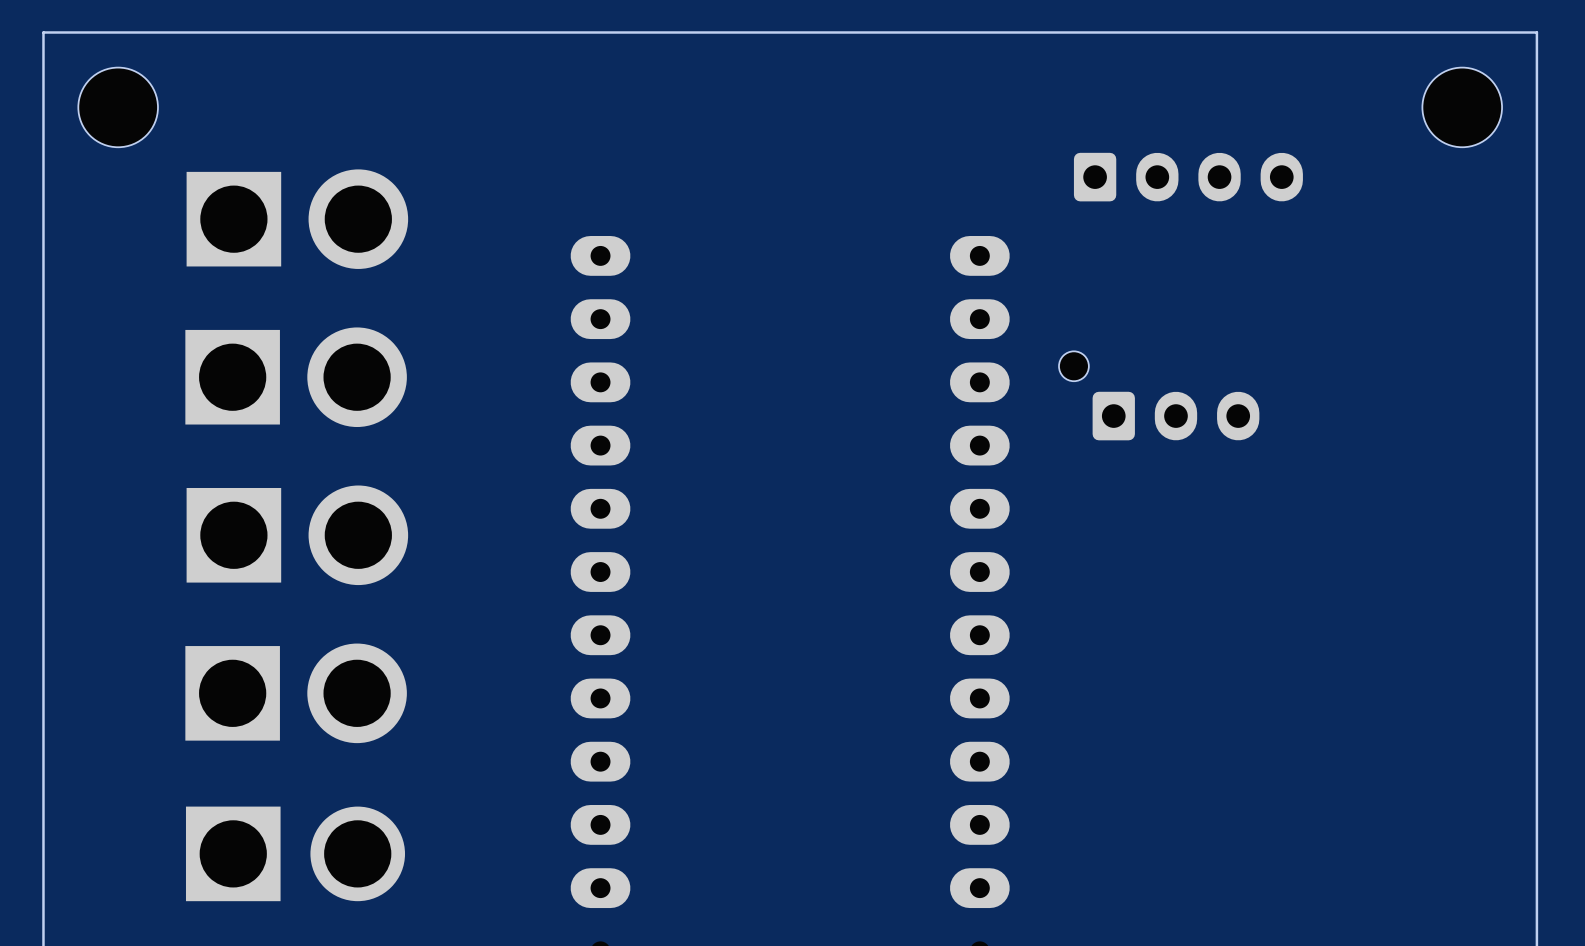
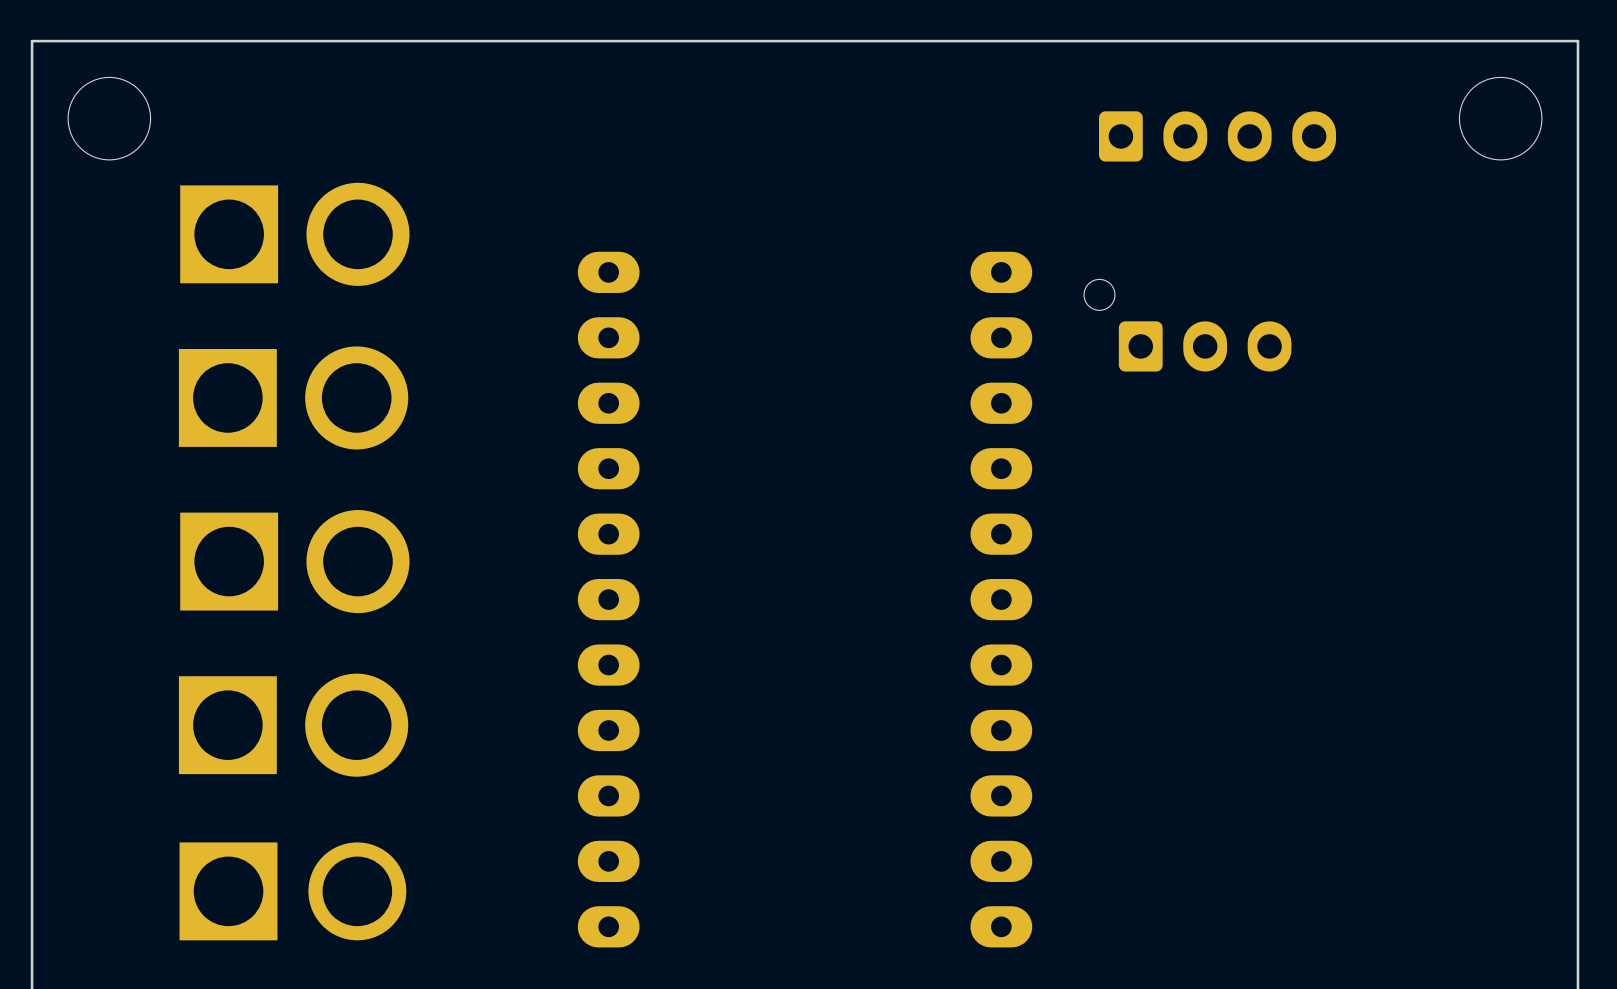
part position: (1188, 177) -> (1217, 136)
part position: (1159, 395) -> (1187, 325)

